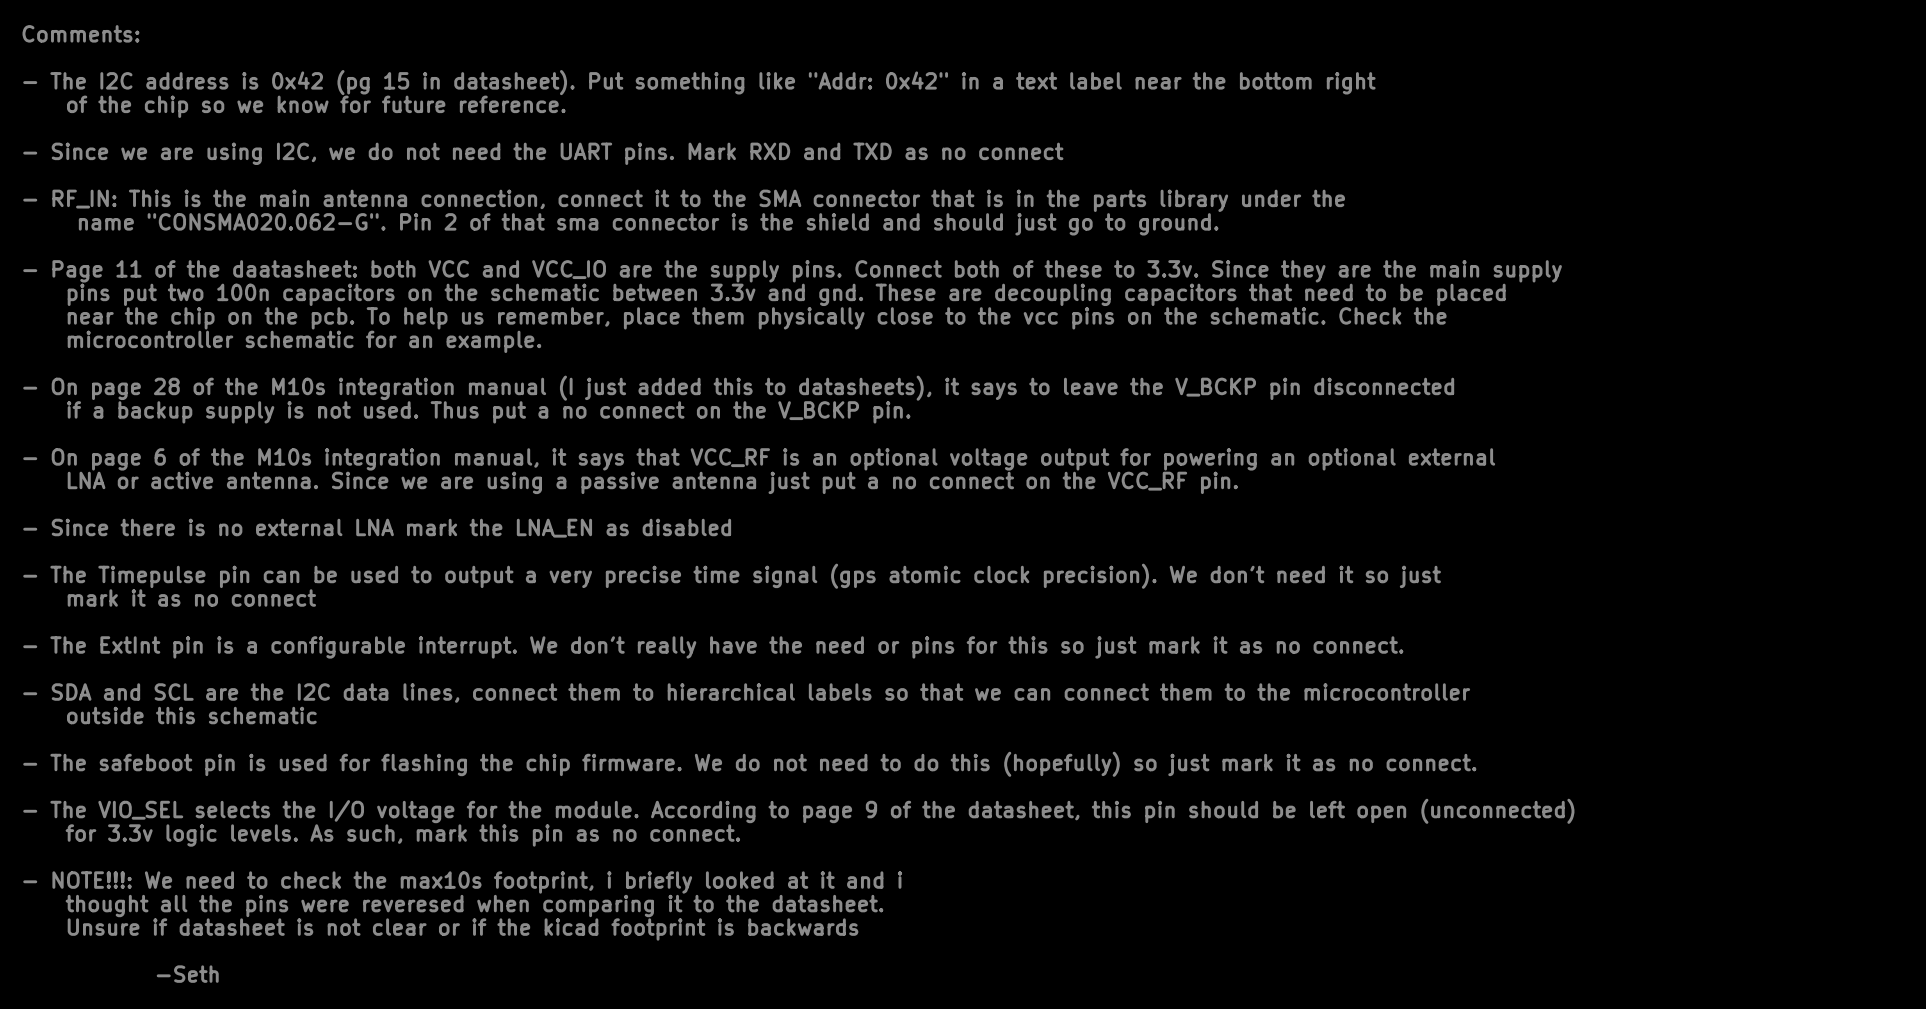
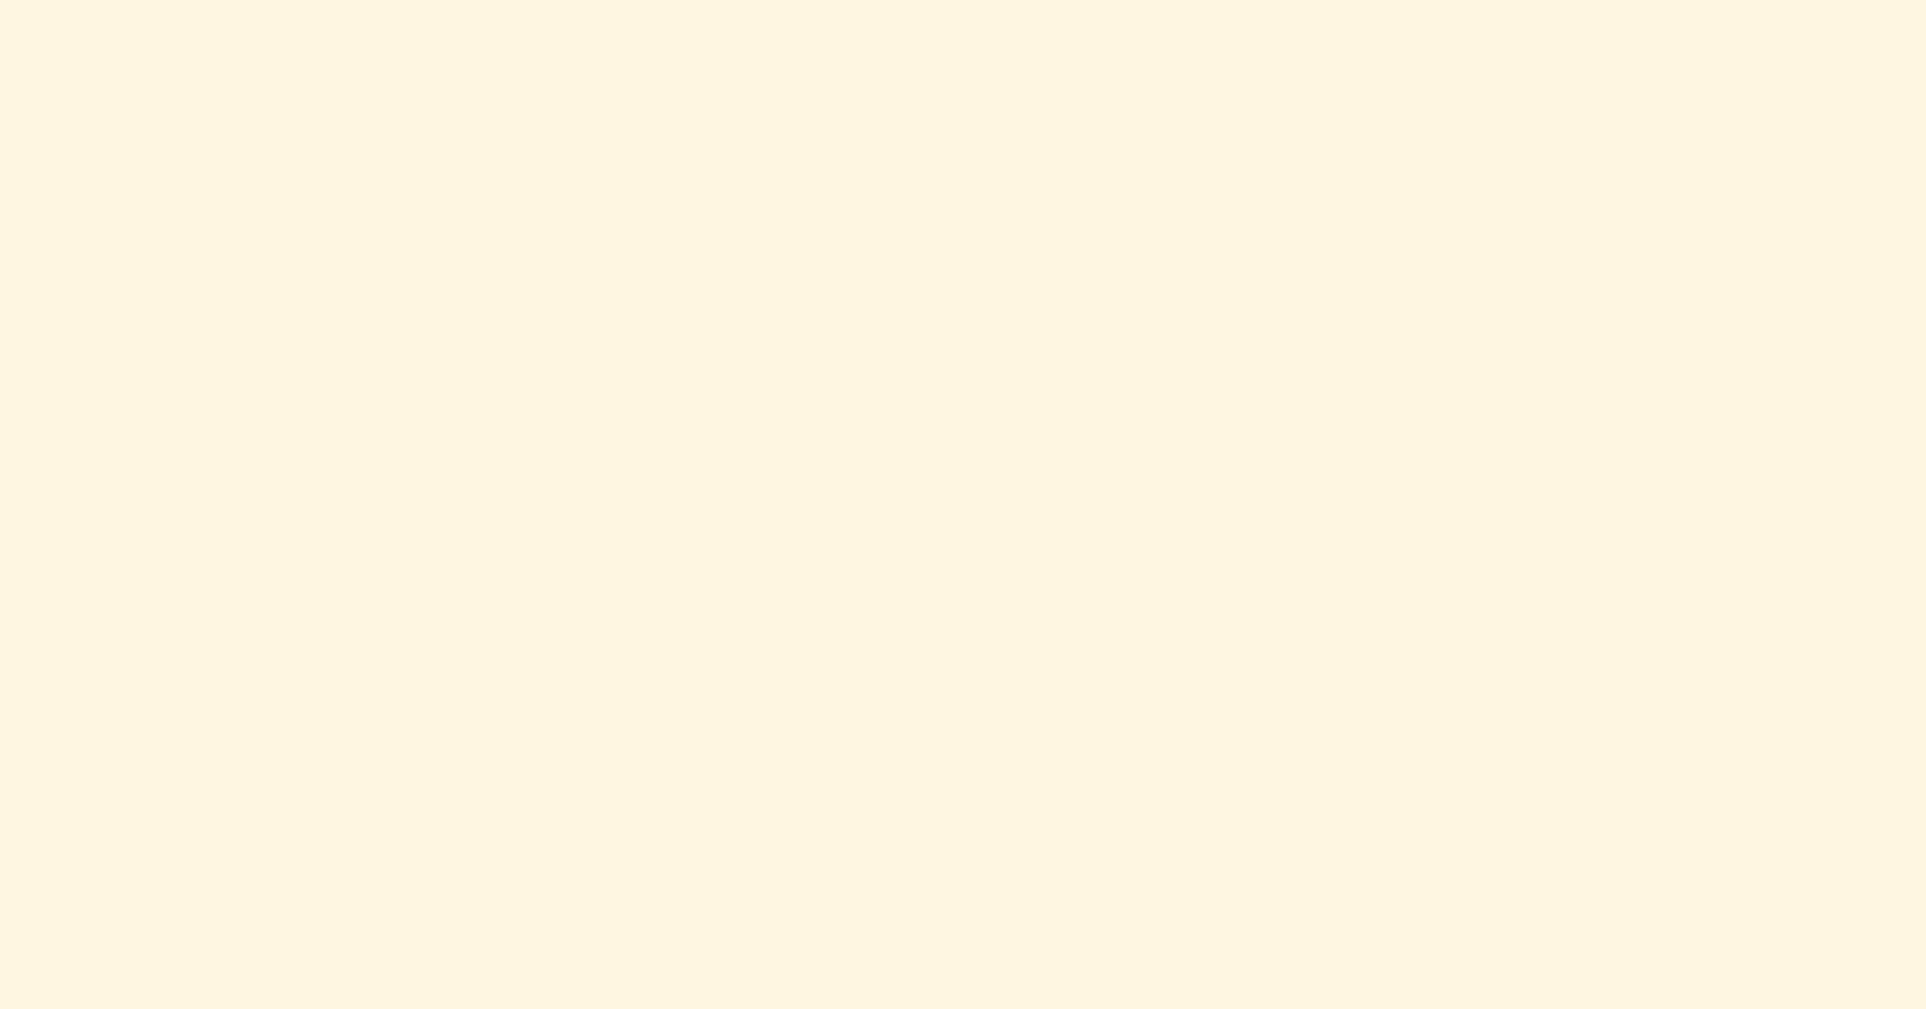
text: Comments: (80, 33) -> none
text: - The I2C address is 0x42 (pg 15 in datasheet). Put something like "Addr: 0x42" in a text label near the bottom right (699, 82) -> none
text: of the chip so we know for future reference. (316, 106) -> none
text: - Since we are using I2C, we do not need the UART pins. Mark RXD and TXD as no connect (543, 153) -> none
text: - RF_IN: This is the main antenna connection, connect it to the SMA connector that is in the parts library under the (684, 200) -> none
text: name "CONSMA020.062-G". Pin 2 of that sma connector is the shield and should just go to ground. (648, 224) -> none
text: - Page 11 of the daatasheet: both VCC and VCC_IO are the supply pins. Connect both of these to 3.3v. Since they are the main supply (792, 271) -> none
text: pins put two 100n capacitors on the schematic between 3.3v and gnd. These are decoupling capacitors that need to be placed (786, 294) -> none
text: near the chip on the pcb. To help us remember, place them physically close to the vcc pins on the schematic. Check the (757, 318) -> none
text: microcontroller schematic for an example. (304, 341) -> none
text: - On page 28 of the M10s integration manual (I just added this to datasheets), it says to leave the V_BCKP pin disconnected (738, 388) -> none
text: if a backup supply is not used. Thus put a no connect on the V_BCKP pin. (488, 412) -> none
text: - On page 6 of the M10s integration manual, it says that VCC_RF is an optional voltage output for powering an optional external (759, 459) -> none
text: LNA or active antenna. Since we are using a passive antenna just put a no connect on the VCC_RF pin. (652, 482) -> none
text: - Since there is no external LNA mark the LNA_EN as disabled (377, 528) -> none
text: - The Timepulse pin can be used to output a very precise time signal (gps atomic clock precision). We don't need it so just (732, 576) -> none
text: mark it as no connect (191, 597) -> none
text: - The ExtInt pin is a configurable interrupt. We don't really have the need or pins for this so just mark it as no connect. (713, 647) -> none
text: - SDA and SCL are the I2C data lines, connect them to hierarchical labels so that we can connect them to the microcontroller (746, 693) -> none
text: outside this schematic (191, 715) -> none
text: - The safeboot pin is used for flashing the chip firmware. We do not need to do this (hopefully) so just mark it as no connect. (749, 764) -> none
text: - The VIO_SEL selects the I/O voltage for the module. According to page 9 of the datasheet, this pin should be left open (unconnected) (798, 811) -> none
text: for 3.3v logic levels. As such, mark this pin as no connect. (402, 835) -> none
text: - NOTE!!!: We need to check the max10s footprint, i briefly looked at it and i (462, 882) -> none
text: thought all the pins were reveresed when comparing it to the datasheet. (474, 906) -> none
text: Unsure if datasheet is not clear or if the kicad footprint is backwards (463, 929) -> none
text: -Seth (187, 974) -> none

